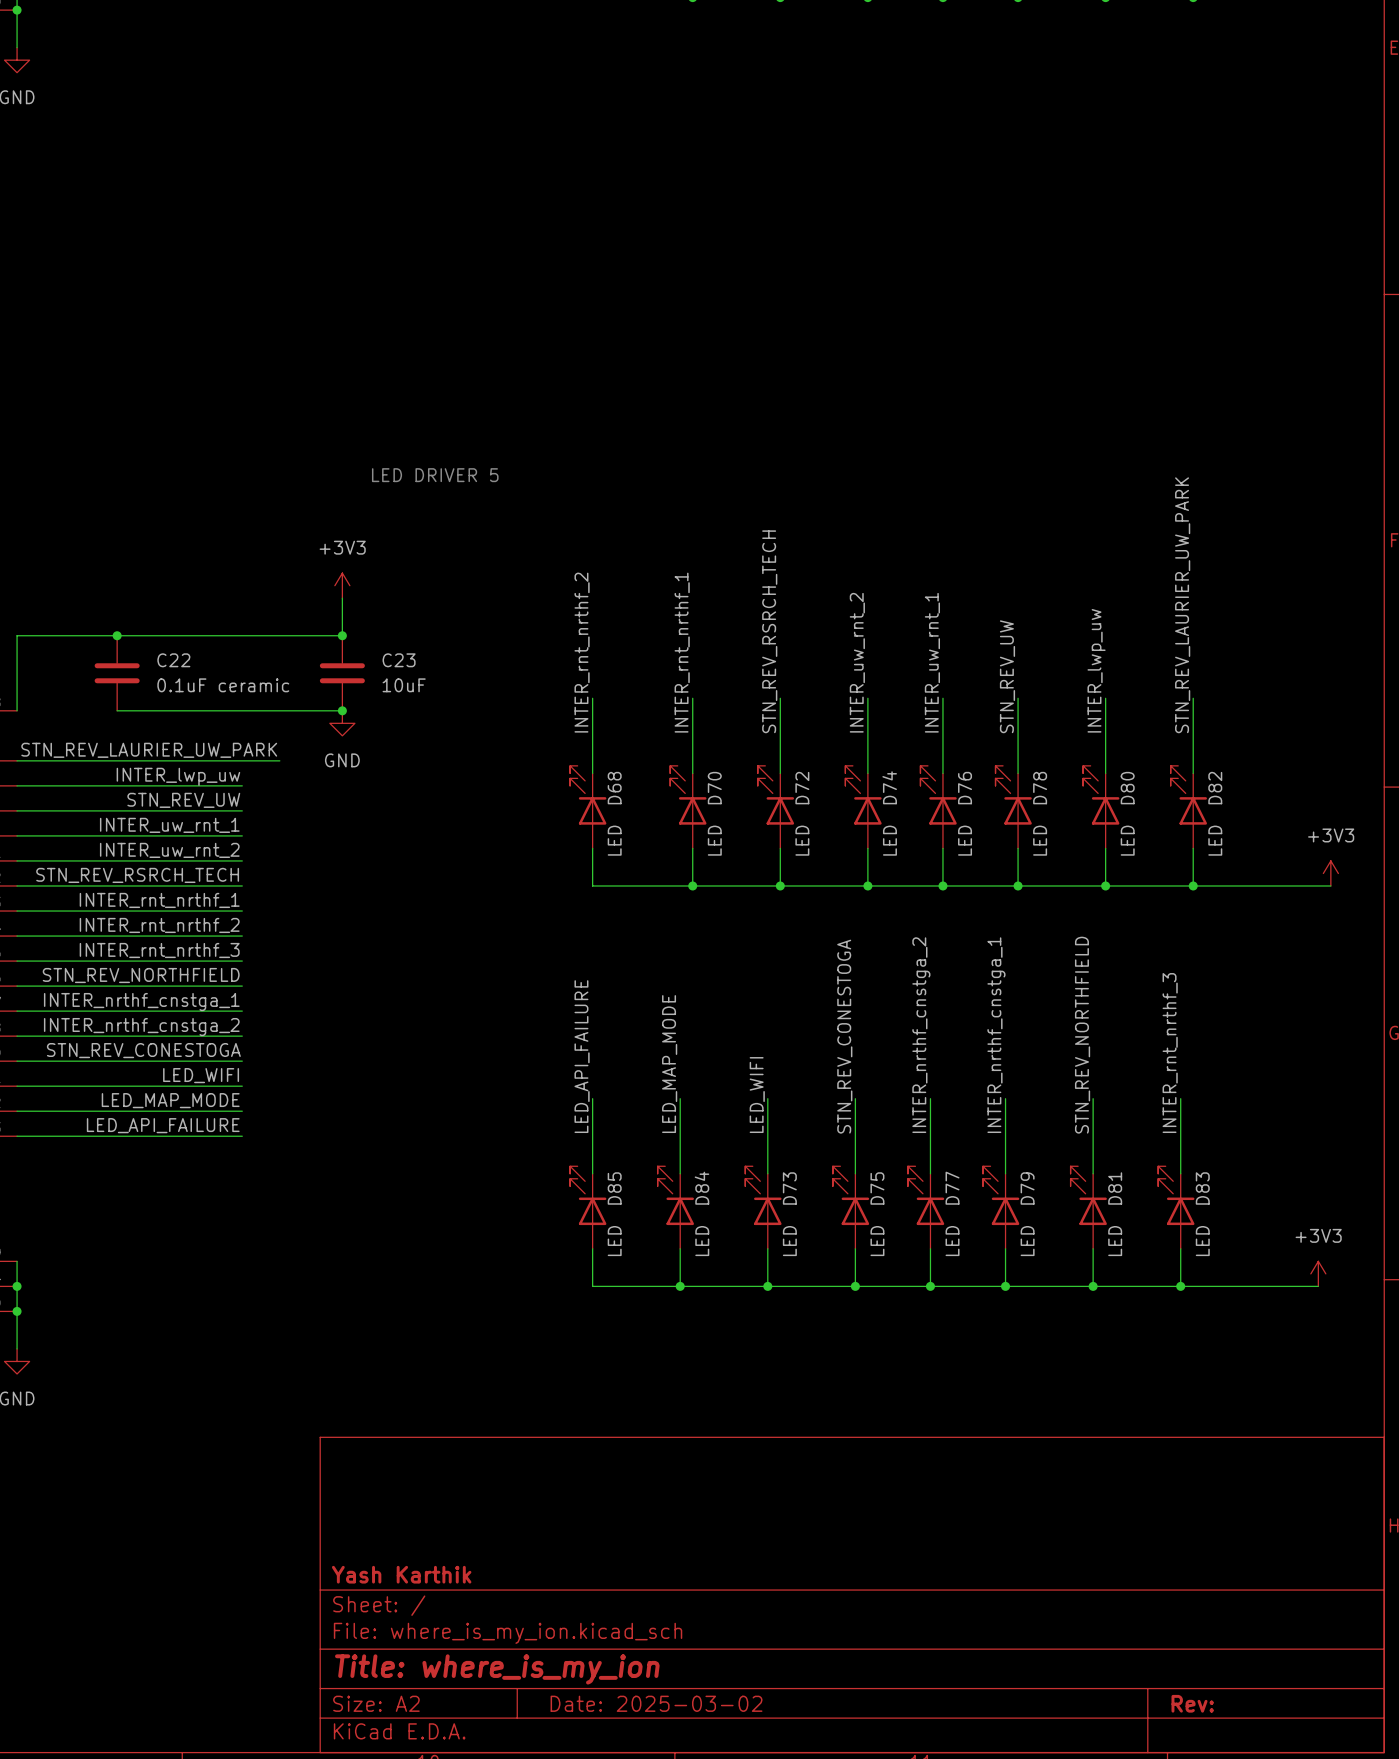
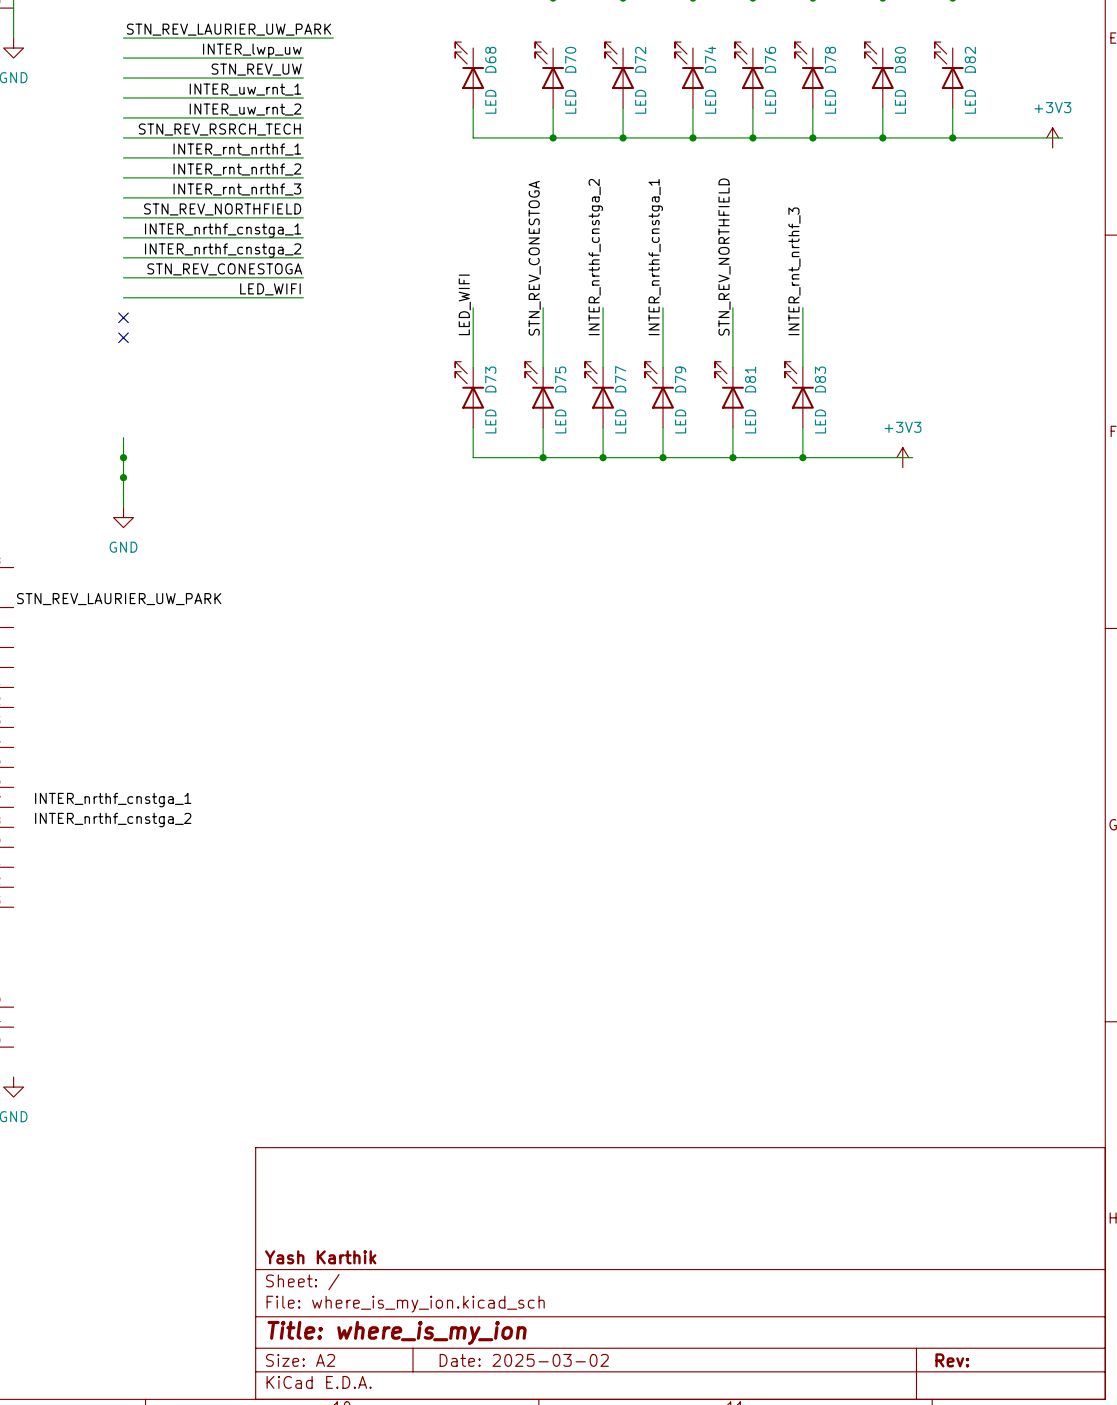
junction: (17, 10) -> none
label: none -> STN_REV_LAURIER_UW_PARK (229, 29)
wire: none -> (123, 38) (333, 38)
label: none -> INTER_lwp_uw (252, 50)
wire: none -> (123, 58) (303, 58)
label: none -> STN_REV_UW (256, 69)
wire: none -> (123, 78) (303, 78)
label: none -> INTER_uw_rnt_1 (245, 89)
wire: none -> (123, 97) (303, 97)
wire: none -> (473, 107) (473, 137) (1062, 137)
wire: none -> (553, 107) (553, 137)
wire: none -> (623, 107) (623, 137)
wire: none -> (692, 107) (692, 137)
wire: none -> (752, 107) (752, 137)
wire: none -> (812, 107) (812, 137)
wire: none -> (882, 107) (882, 137)
wire: none -> (952, 107) (952, 137)
label: none -> INTER_uw_rnt_2 (245, 109)
wire: none -> (123, 117) (303, 117)
label: none -> STN_REV_RSRCH_TECH (219, 129)
wire: none -> (123, 137) (303, 137)
junction: none -> (553, 137)
junction: none -> (623, 137)
junction: none -> (692, 137)
junction: none -> (752, 137)
junction: none -> (812, 137)
junction: none -> (882, 137)
junction: none -> (952, 137)
power symbol: none -> +3V3 (1052, 137)
label: none -> INTER_rnt_nrthf_1 (237, 149)
wire: none -> (123, 157) (303, 157)
label: none -> INTER_rnt_nrthf_2 (237, 169)
wire: none -> (123, 177) (303, 177)
label: none -> INTER_rnt_nrthf_3 (237, 189)
wire: none -> (123, 197) (303, 197)
label: none -> STN_REV_NORTHFIELD (222, 209)
wire: none -> (123, 217) (303, 217)
label: none -> INTER_nrthf_cnstga_1 (223, 230)
wire: none -> (123, 237) (303, 237)
label: none -> INTER_nrthf_cnstga_2 (223, 250)
label: none -> INTER_nrthf_cnstga_2 (595, 257)
label: none -> INTER_nrthf_cnstga_1 (655, 257)
label: none -> STN_REV_NORTHFIELD (724, 257)
wire: none -> (123, 257) (303, 257)
label: none -> STN_REV_CONESTOGA (534, 258)
label: none -> STN_REV_CONESTOGA (224, 269)
label: none -> INTER_rnt_nrthf_3 (794, 271)
wire: none -> (123, 277) (303, 277)
label: none -> LED_WIFI (270, 289)
wire: none -> (123, 297) (303, 297)
label: none -> LED_WIFI (464, 304)
wire: none -> (473, 307) (473, 367)
wire: none -> (543, 307) (543, 367)
wire: none -> (603, 307) (603, 367)
wire: none -> (663, 307) (663, 367)
wire: none -> (732, 307) (732, 367)
wire: none -> (802, 307) (802, 367)
no-connect mark: none -> (123, 317)
no-connect mark: none -> (123, 337)
text: LED DRIVER 5 (435, 475) -> none
wire: none -> (473, 427) (473, 457) (912, 457)
wire: none -> (543, 427) (543, 457)
wire: none -> (603, 427) (603, 457)
wire: none -> (663, 427) (663, 457)
wire: none -> (732, 427) (732, 457)
wire: none -> (802, 427) (802, 457)
wire: none -> (123, 437) (123, 507)
junction: none -> (123, 457)
junction: none -> (543, 457)
junction: none -> (603, 457)
junction: none -> (663, 457)
junction: none -> (732, 457)
junction: none -> (802, 457)
power symbol: none -> +3V3 (902, 457)
power symbol: +3V3 (342, 585) -> none
junction: none -> (123, 477)
wire: (342, 598) (342, 635) (17, 635) (17, 710) -> none
label: STN_REV_LAURIER_UW_PARK (1182, 605) -> none
label: STN_REV_RSRCH_TECH (769, 631) -> none
junction: (117, 635) -> none
junction: (342, 635) -> none
label: INTER_rnt_nrthf_2 (582, 652) -> none
label: INTER_rnt_nrthf_1 (682, 652) -> none
label: INTER_uw_rnt_2 (857, 662) -> none
label: INTER_uw_rnt_1 (932, 662) -> none
label: INTER_lwp_uw (1096, 670) -> none
C22: 0.1uF ceramic (117, 673) -> none
C23: 10uF (342, 673) -> none
label: STN_REV_UW (1007, 676) -> none
wire: (592, 698) (592, 773) -> none
wire: (692, 698) (692, 773) -> none
wire: (780, 698) (780, 773) -> none
wire: (867, 698) (867, 773) -> none
wire: (942, 698) (942, 773) -> none
wire: (1018, 698) (1018, 773) -> none
wire: (1105, 698) (1105, 773) -> none
wire: (1193, 698) (1193, 773) -> none
wire: (117, 710) (342, 710) -> none
junction: (342, 710) -> none
power symbol position: GND (342, 723) -> GND (123, 517)
wire: (17, 760) (279, 760) -> none
label: INTER_lwp_uw (178, 776) -> none
wire: (17, 785) (242, 785) -> none
label: STN_REV_UW (183, 800) -> none
D68 position: (588, 807) -> (469, 75)
D70 position: (688, 807) -> (549, 75)
D72 position: (775, 807) -> (619, 75)
D74 position: (863, 807) -> (689, 75)
D76 position: (938, 807) -> (749, 75)
D78 position: (1013, 807) -> (809, 75)
D80 position: (1101, 807) -> (879, 75)
D82 position: (1188, 807) -> (949, 75)
wire: (17, 810) (242, 810) -> none
label: INTER_uw_rnt_1 (169, 825) -> none
wire: (17, 835) (242, 835) -> none
wire: (592, 848) (592, 885) (1330, 885) -> none
wire: (692, 848) (692, 885) -> none
wire: (780, 848) (780, 885) -> none
wire: (867, 848) (867, 885) -> none
wire: (942, 848) (942, 885) -> none
wire: (1018, 848) (1018, 885) -> none
wire: (1105, 848) (1105, 885) -> none
wire: (1193, 848) (1193, 885) -> none
label: INTER_uw_rnt_2 (169, 850) -> none
wire: (17, 860) (242, 860) -> none
power symbol: +3V3 (1330, 873) -> none
label: STN_REV_RSRCH_TECH (137, 875) -> none
wire: (17, 885) (242, 885) -> none
junction: (692, 885) -> none
junction: (780, 885) -> none
junction: (867, 885) -> none
junction: (942, 885) -> none
junction: (1018, 885) -> none
junction: (1105, 885) -> none
junction: (1193, 885) -> none
label: INTER_rnt_nrthf_1 (159, 900) -> none
wire: (17, 911) (242, 911) -> none
label: INTER_rnt_nrthf_2 (159, 925) -> none
wire: (17, 936) (242, 936) -> none
label: INTER_rnt_nrthf_3 (159, 950) -> none
wire: (17, 961) (242, 961) -> none
label: STN_REV_NORTHFIELD (141, 975) -> none
wire: (17, 986) (242, 986) -> none
wire: (17, 1011) (242, 1011) -> none
label: INTER_nrthf_cnstga_2 (921, 1035) -> none
label: INTER_nrthf_cnstga_1 (996, 1035) -> none
label: STN_REV_NORTHFIELD (1082, 1035) -> none
wire: (17, 1036) (242, 1036) -> none
label: STN_REV_CONESTOGA (844, 1036) -> none
label: STN_REV_CONESTOGA (143, 1050) -> none
label: INTER_rnt_nrthf_3 (1170, 1053) -> none
label: LED_API_FAILURE (582, 1056) -> none
wire: (17, 1061) (242, 1061) -> none
label: LED_MAP_MODE (669, 1064) -> none
label: LED_WIFI (201, 1075) -> none
wire: (17, 1086) (242, 1086) -> none
label: LED_WIFI (757, 1095) -> none
wire: (592, 1098) (592, 1173) -> none
wire: (680, 1098) (680, 1173) -> none
wire: (767, 1098) (767, 1173) -> none
wire: (855, 1098) (855, 1173) -> none
wire: (930, 1098) (930, 1173) -> none
wire: (1005, 1098) (1005, 1173) -> none
wire: (1093, 1098) (1093, 1173) -> none
wire: (1180, 1098) (1180, 1173) -> none
label: LED_MAP_MODE (170, 1100) -> none
wire: (17, 1111) (242, 1111) -> none
label: LED_API_FAILURE (163, 1125) -> none
wire: (17, 1136) (242, 1136) -> none
D85: LED (588, 1207) -> none
D84: LED (675, 1207) -> none
D73 position: (763, 1207) -> (469, 394)
D75 position: (851, 1207) -> (539, 394)
D77 position: (926, 1207) -> (599, 394)
D79 position: (1001, 1207) -> (659, 394)
D81 position: (1088, 1207) -> (729, 394)
D83 position: (1176, 1207) -> (799, 394)
wire: (592, 1248) (592, 1286) (1318, 1286) -> none
wire: (680, 1248) (680, 1286) -> none
wire: (767, 1248) (767, 1286) -> none
wire: (855, 1248) (855, 1286) -> none
wire: (930, 1248) (930, 1286) -> none
wire: (1005, 1248) (1005, 1286) -> none
wire: (1093, 1248) (1093, 1286) -> none
wire: (1180, 1248) (1180, 1286) -> none
wire: (17, 1261) (17, 1348) -> none
power symbol: +3V3 (1318, 1273) -> none
junction: (17, 1286) -> none
junction: (680, 1286) -> none
junction: (767, 1286) -> none
junction: (855, 1286) -> none
junction: (930, 1286) -> none
junction: (1005, 1286) -> none
junction: (1093, 1286) -> none
junction: (1180, 1286) -> none
junction: (17, 1311) -> none

